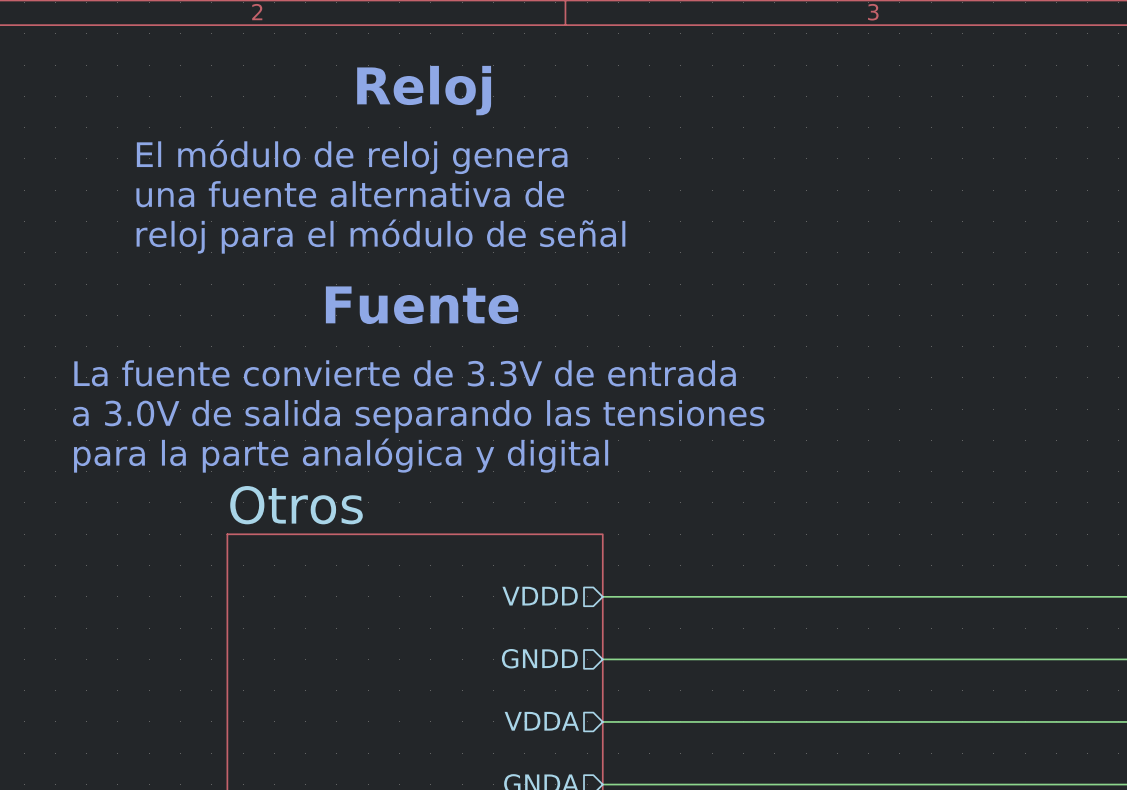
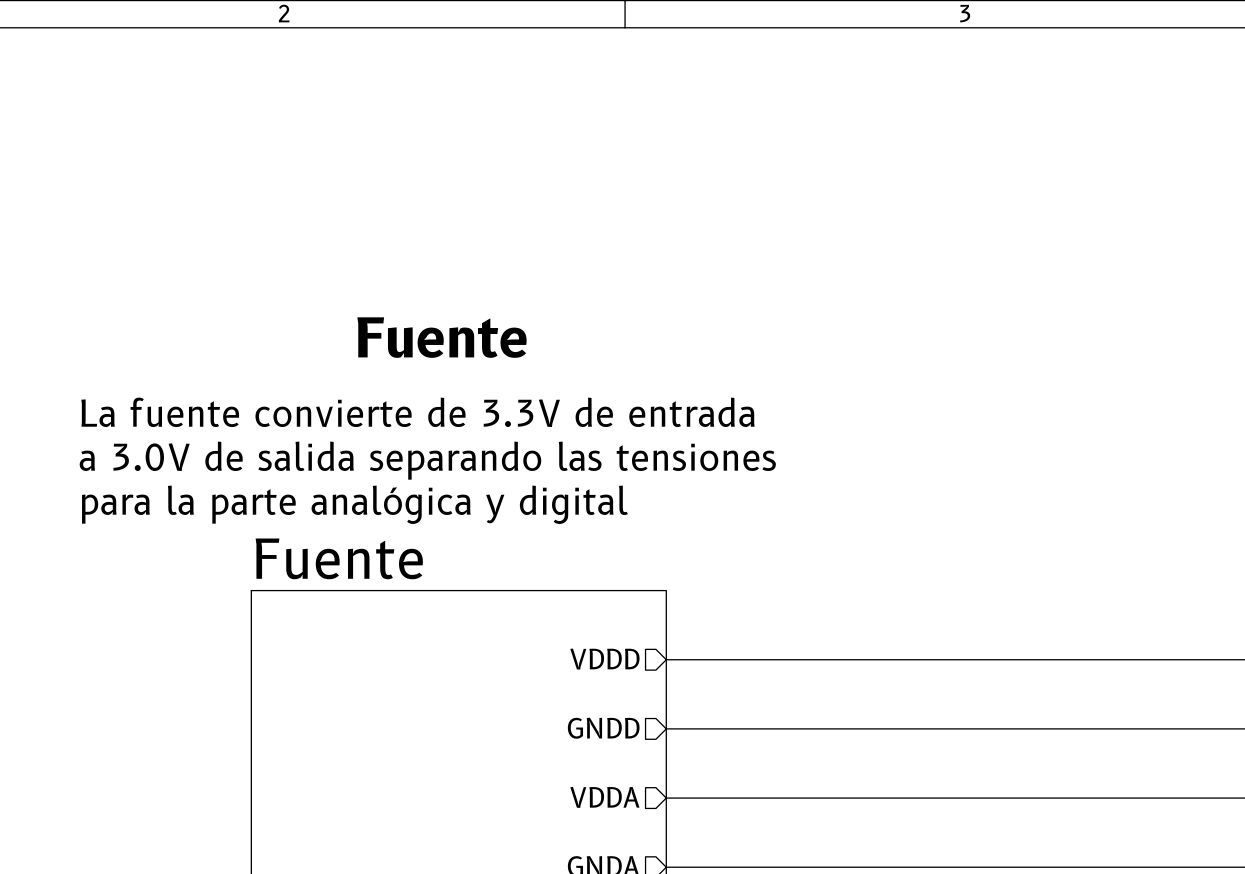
text: Reloj (424, 90) -> none
text: El módulo de reloj genera (352, 157) -> none
text: una fuente alternativa de (350, 194) -> none
text: reloj para el módulo de señal (380, 236) -> none
sheet Otros name: Otros (296, 505) -> Fuente (339, 558)

